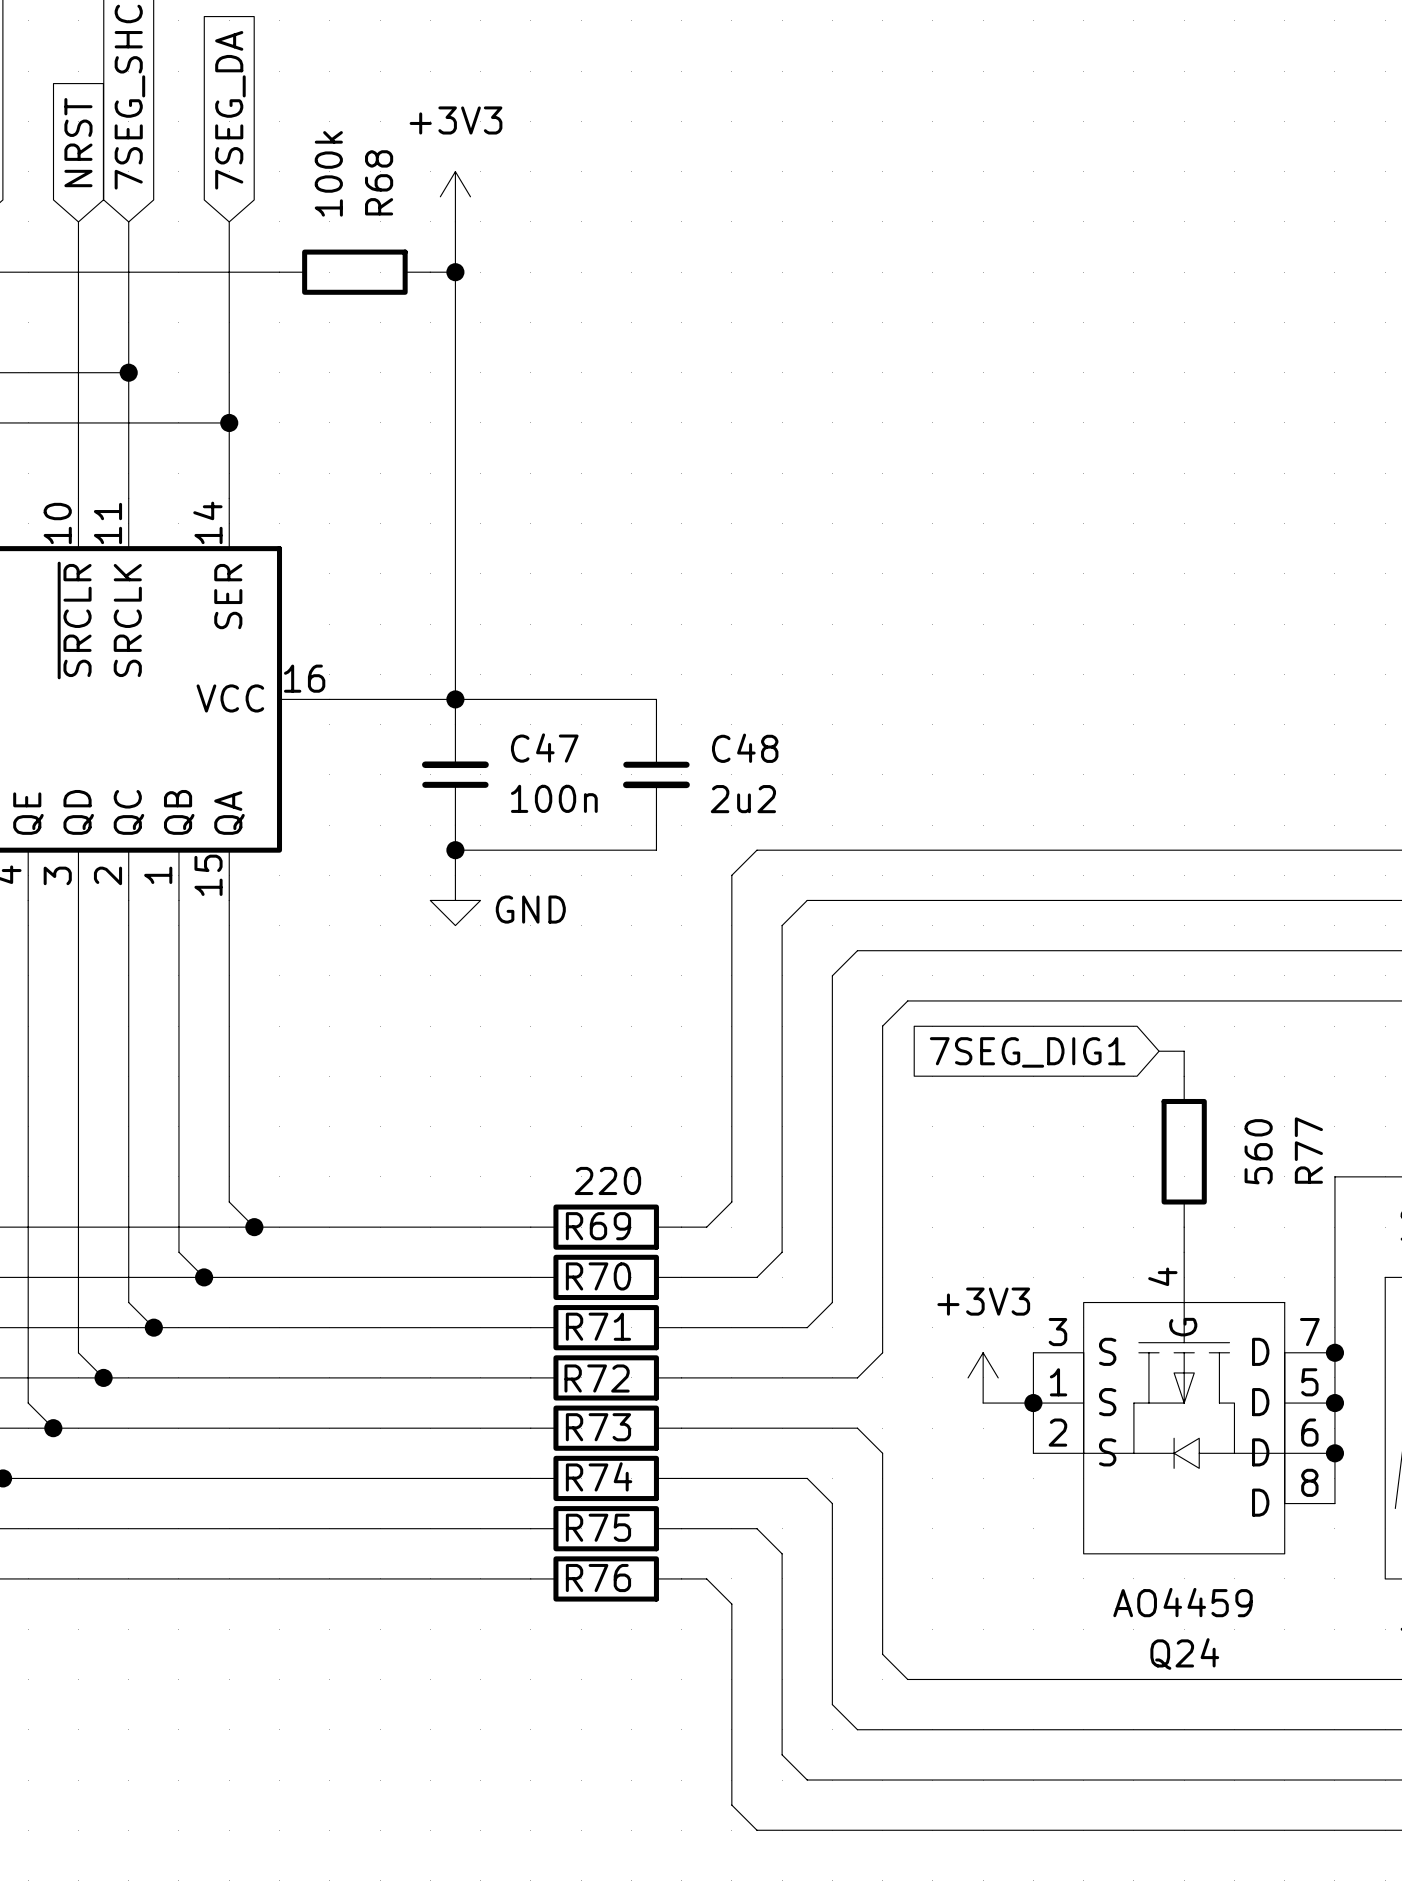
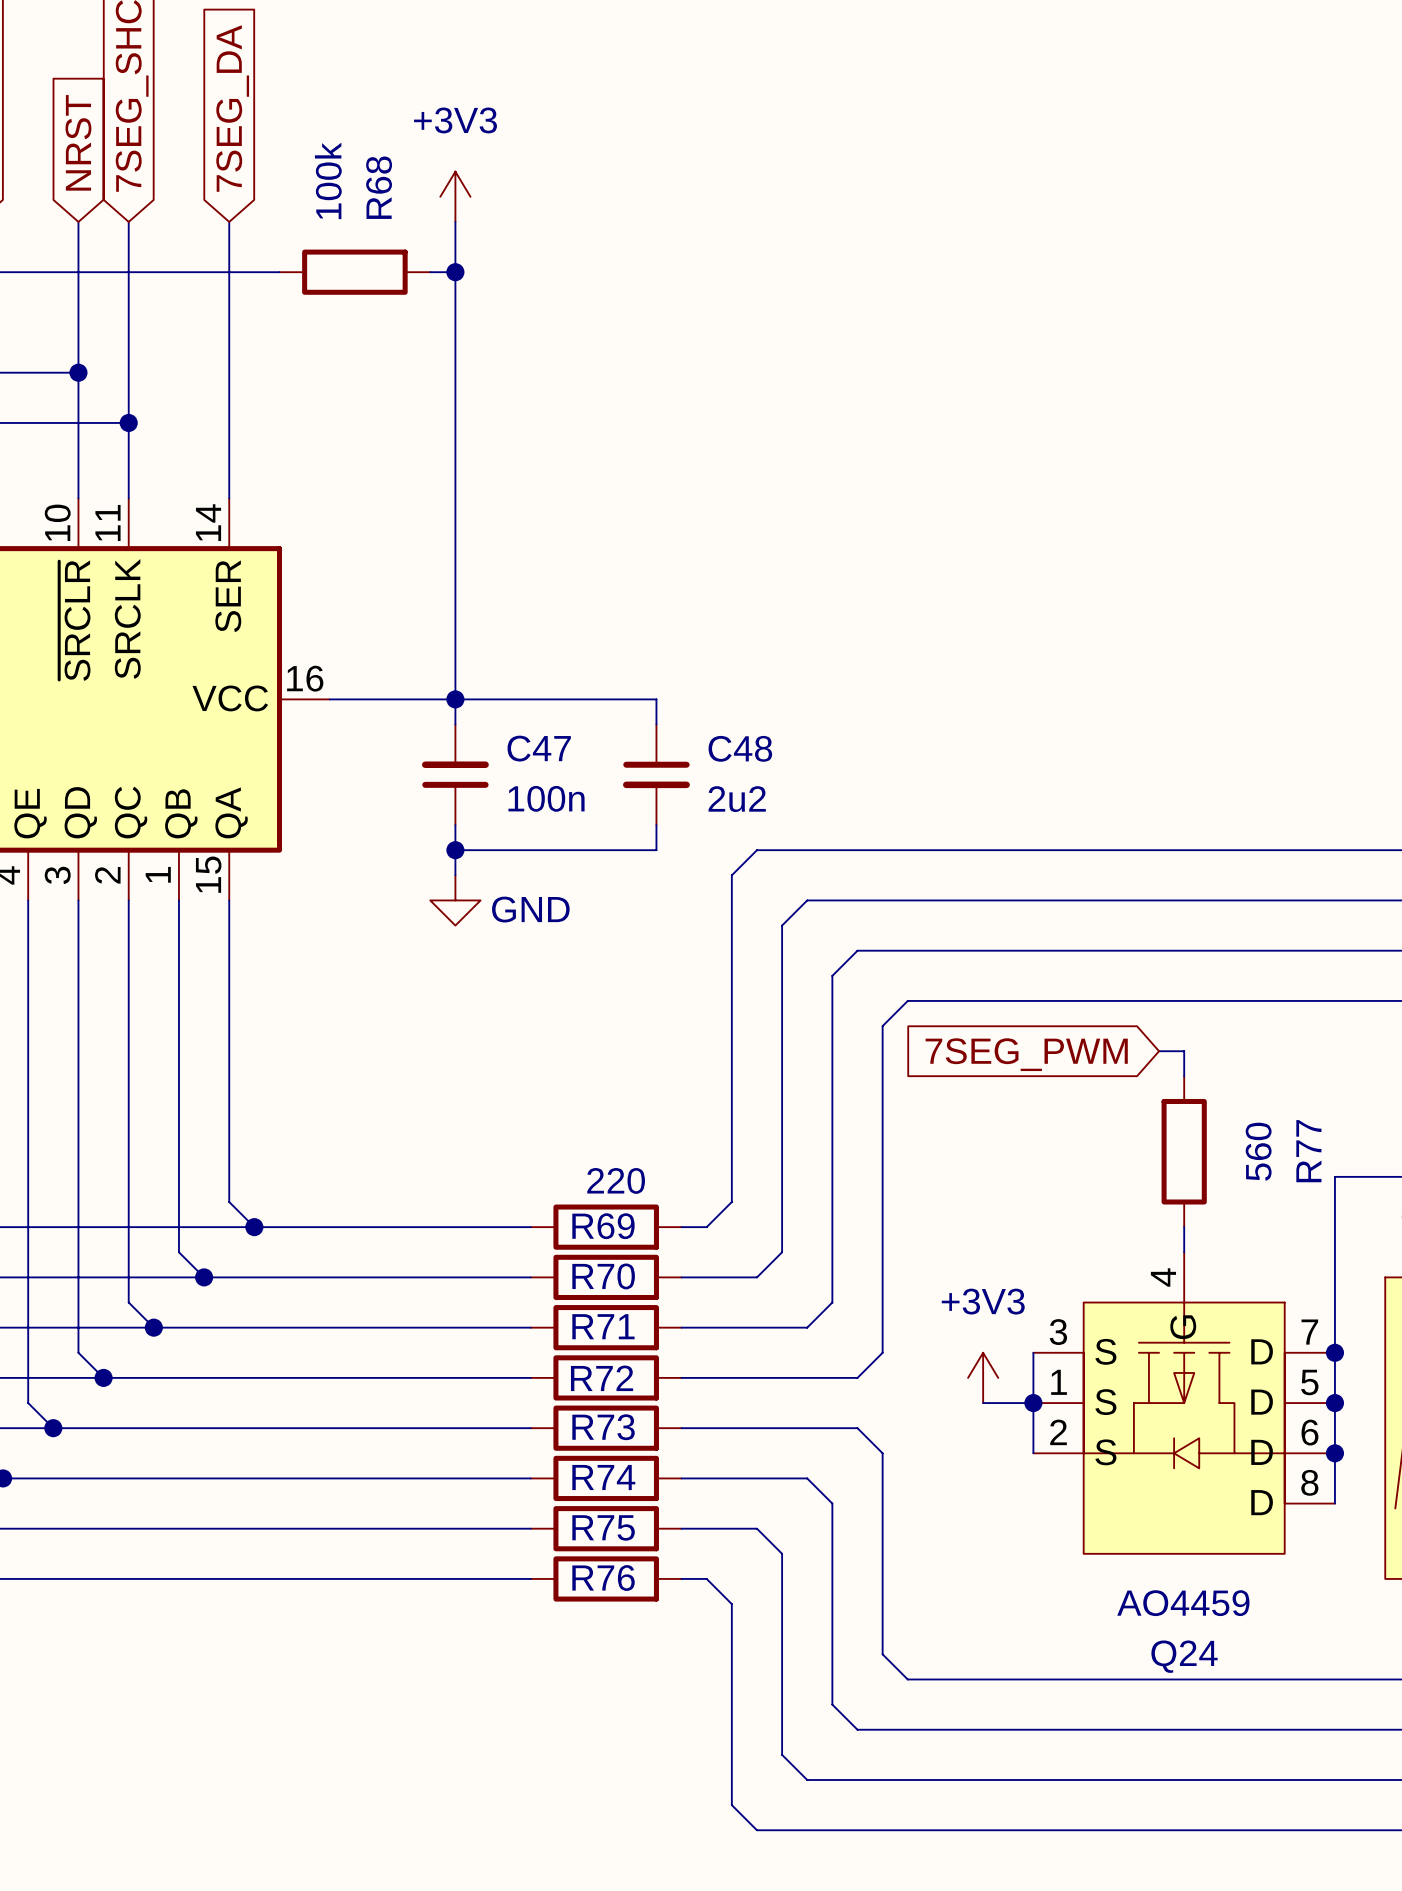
wire: (78, 372) (128, 372) -> none
junction: none -> (78, 372)
junction: (128, 372) -> none
wire: (128, 422) (229, 422) -> none
junction: none -> (128, 422)
junction: (229, 422) -> none
global label: 7SEG_DIG1 (1027, 1052) -> 7SEG_PWM (1026, 1054)

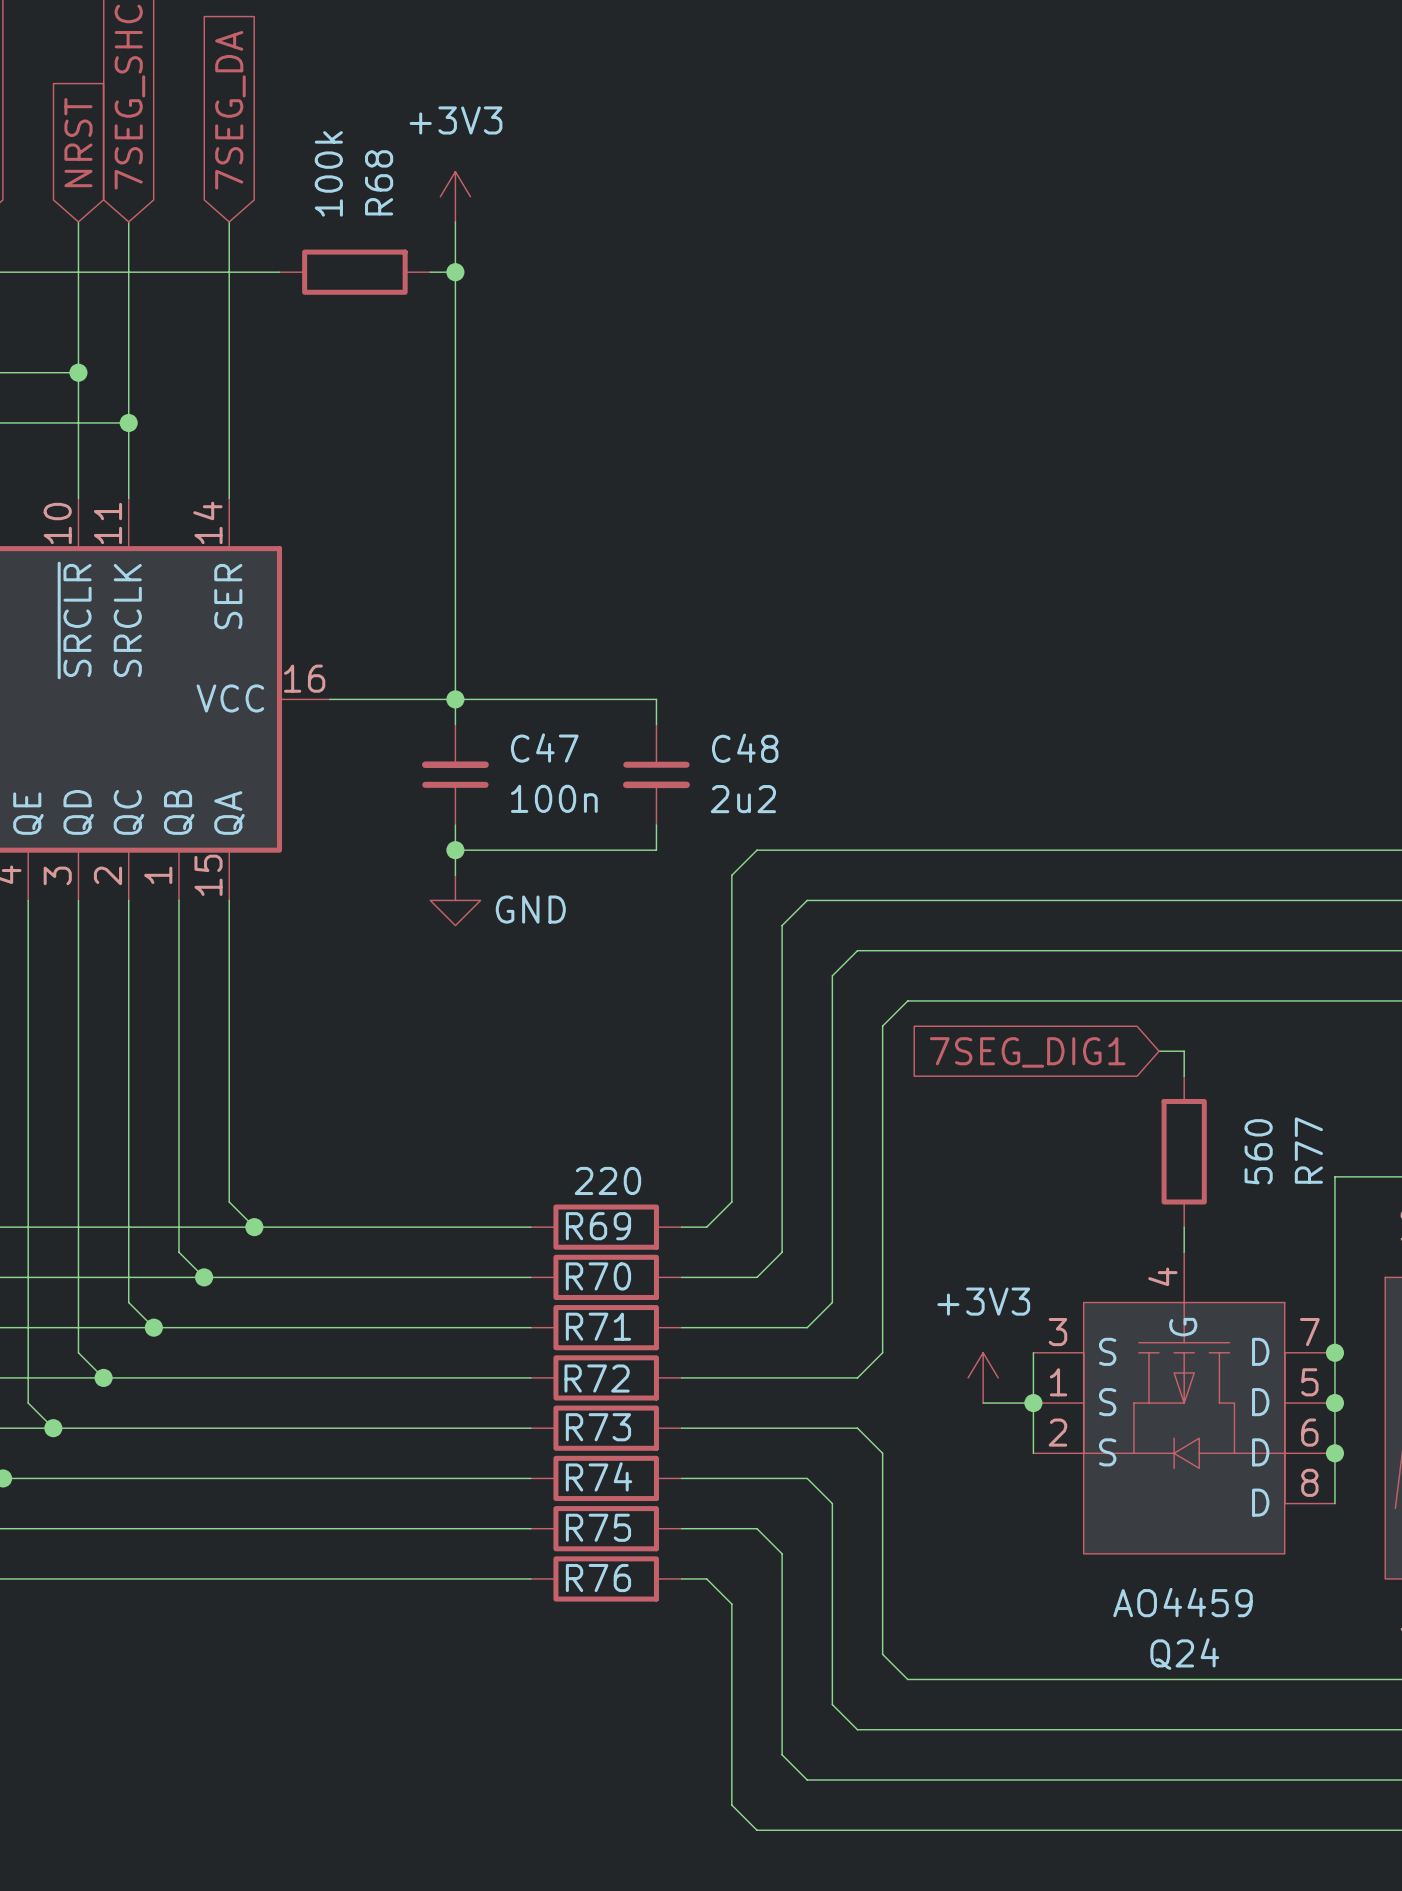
global label: 7SEG_PWM (1026, 1054) -> 7SEG_DIG1 (1027, 1052)

